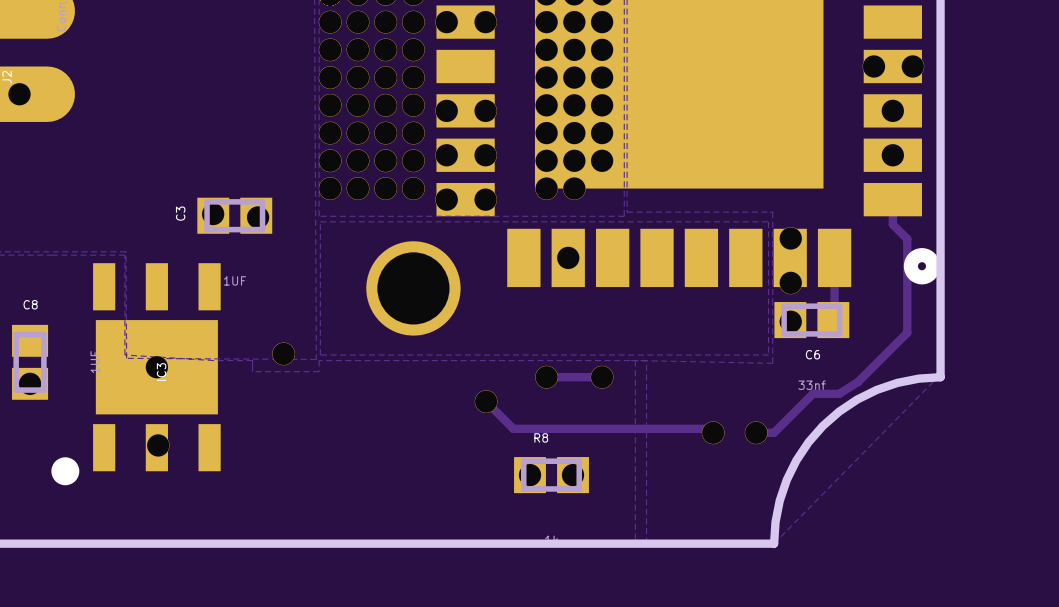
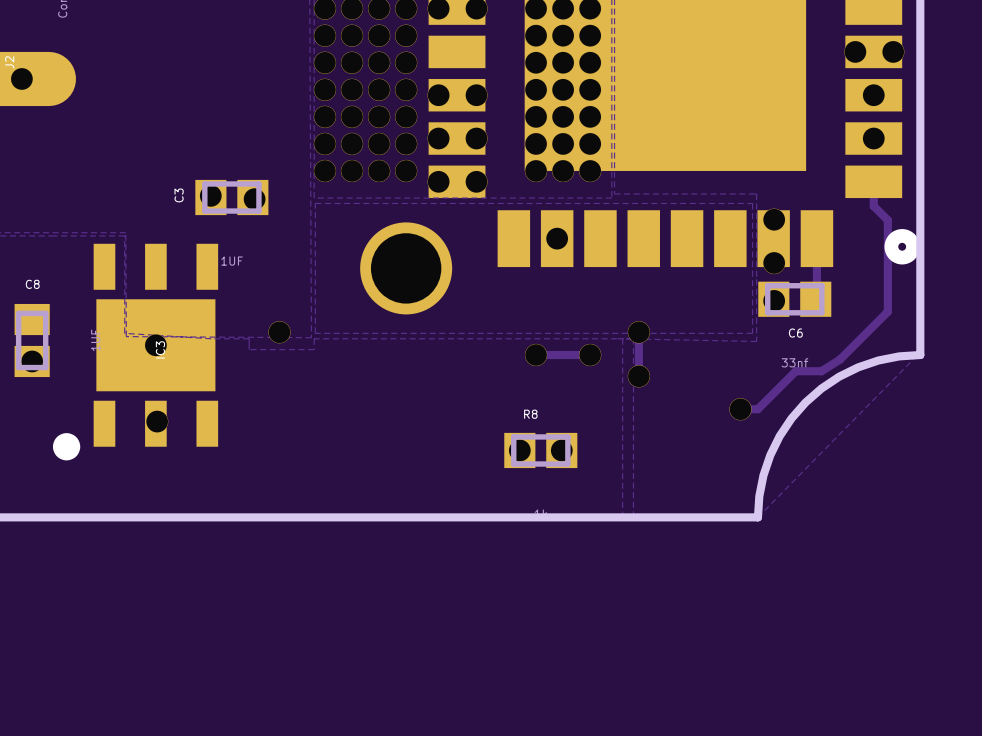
via: none -> (590, 170)
track: none -> (638, 332) (638, 376)
via: none -> (638, 332)
via: none -> (638, 376)
track: (486, 401) (513, 428) (709, 428) (713, 432) -> none
via: (486, 401) -> none
via: (713, 432) -> none

